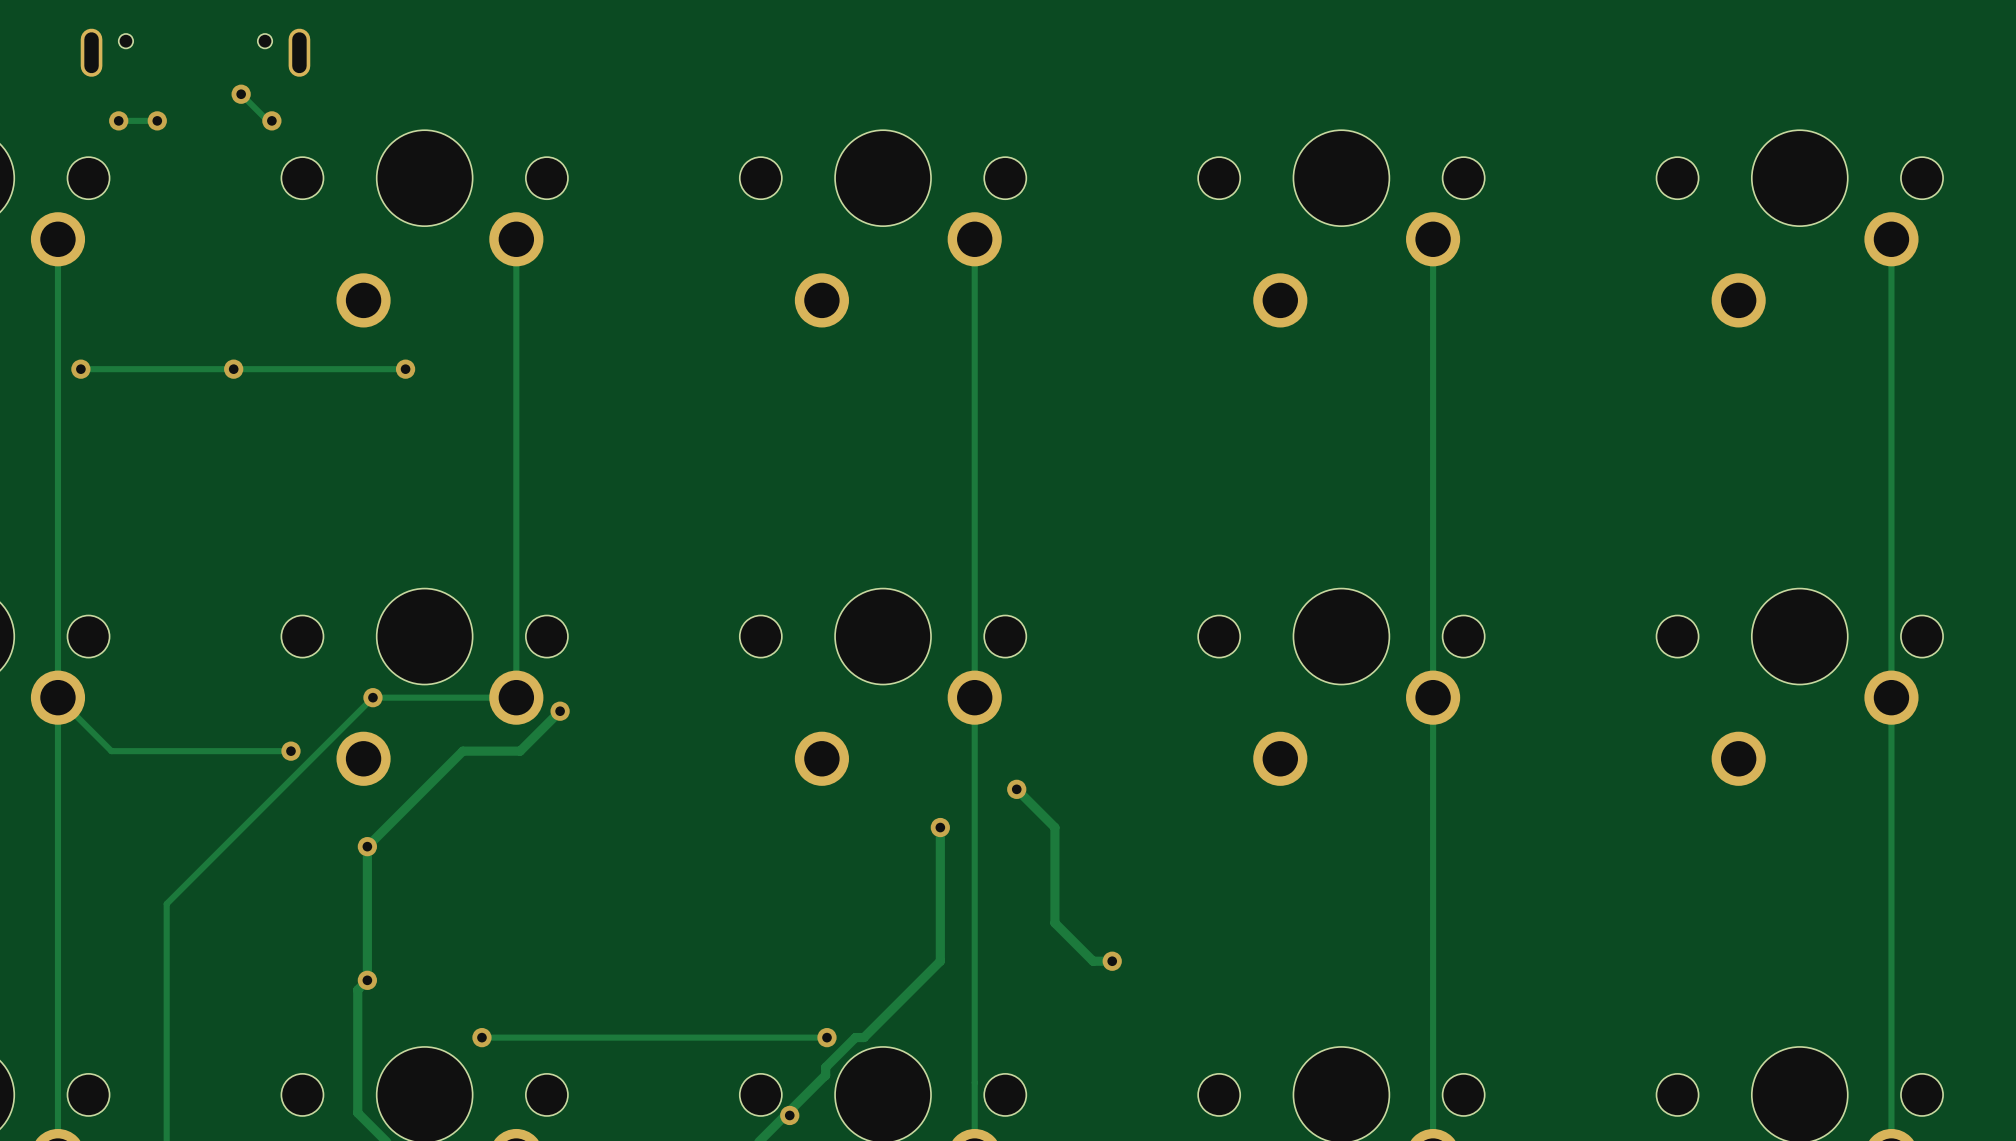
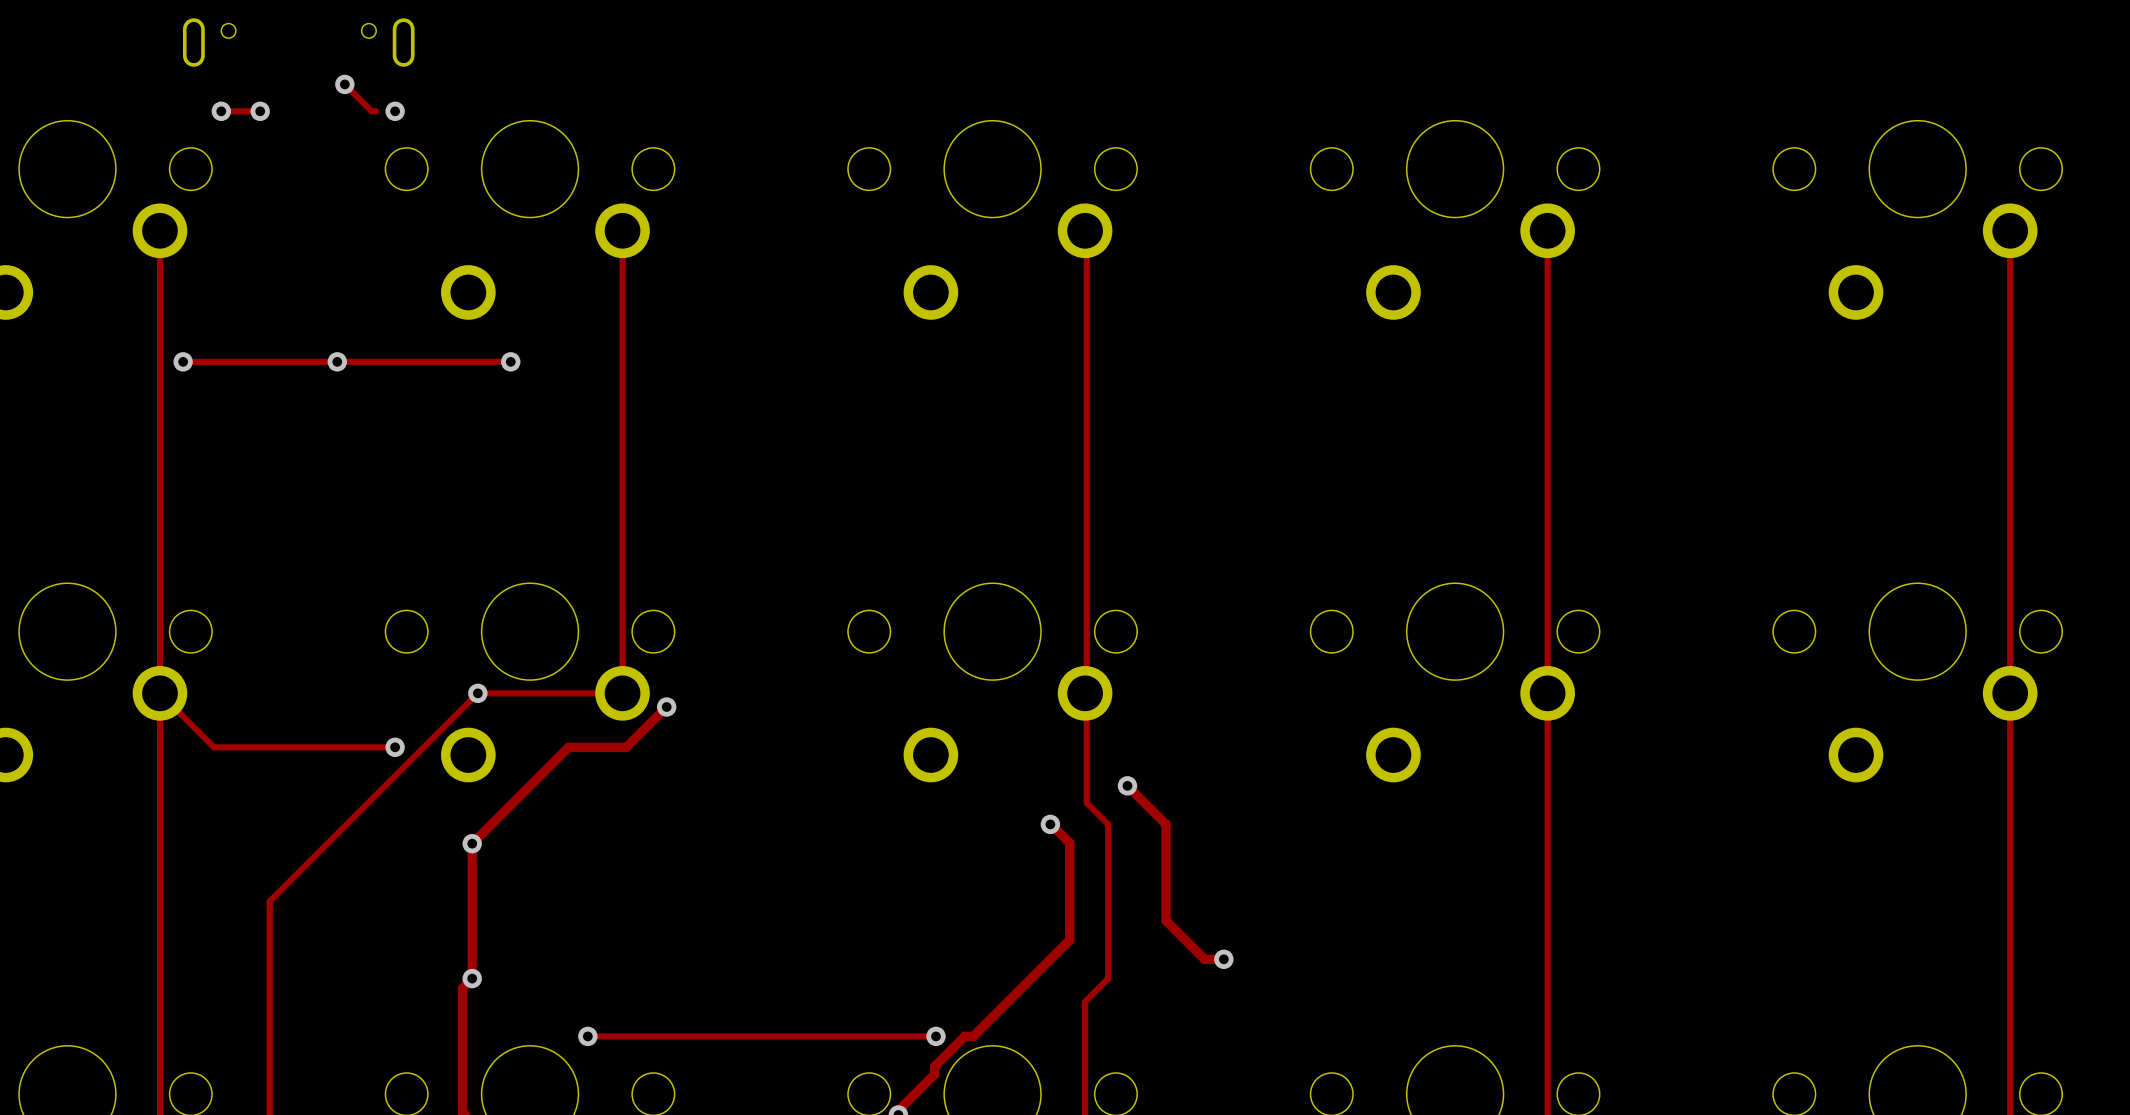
via position: (271, 120) -> (395, 111)
track: (974, 239) (974, 1003) -> (1085, 230) (1086, 232) (1086, 802) (1108, 824) (1108, 978) (1085, 1001)
track: (940, 827) (940, 961) -> (1055, 829) (1069, 842) (1069, 940) (1050, 959)

